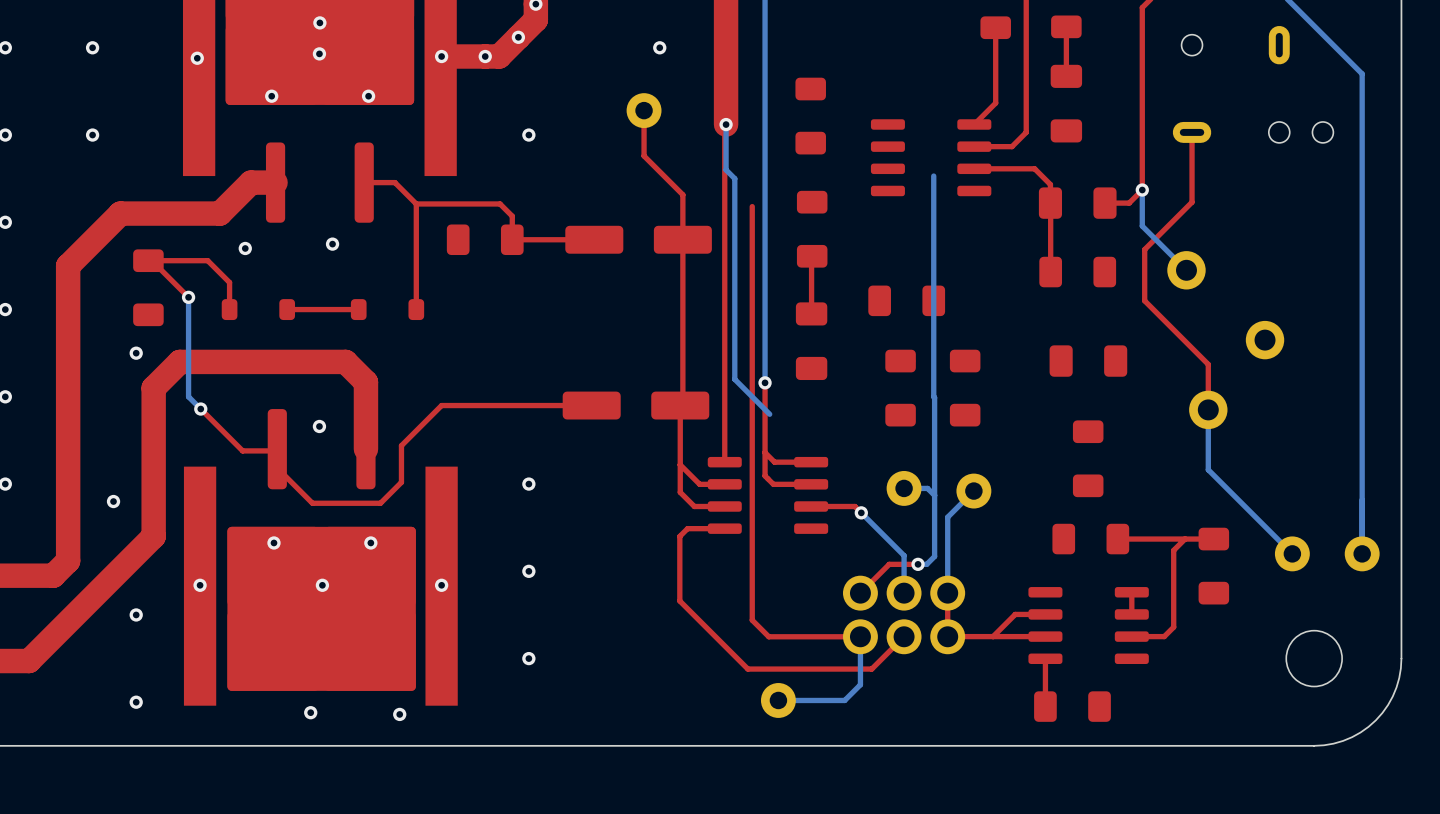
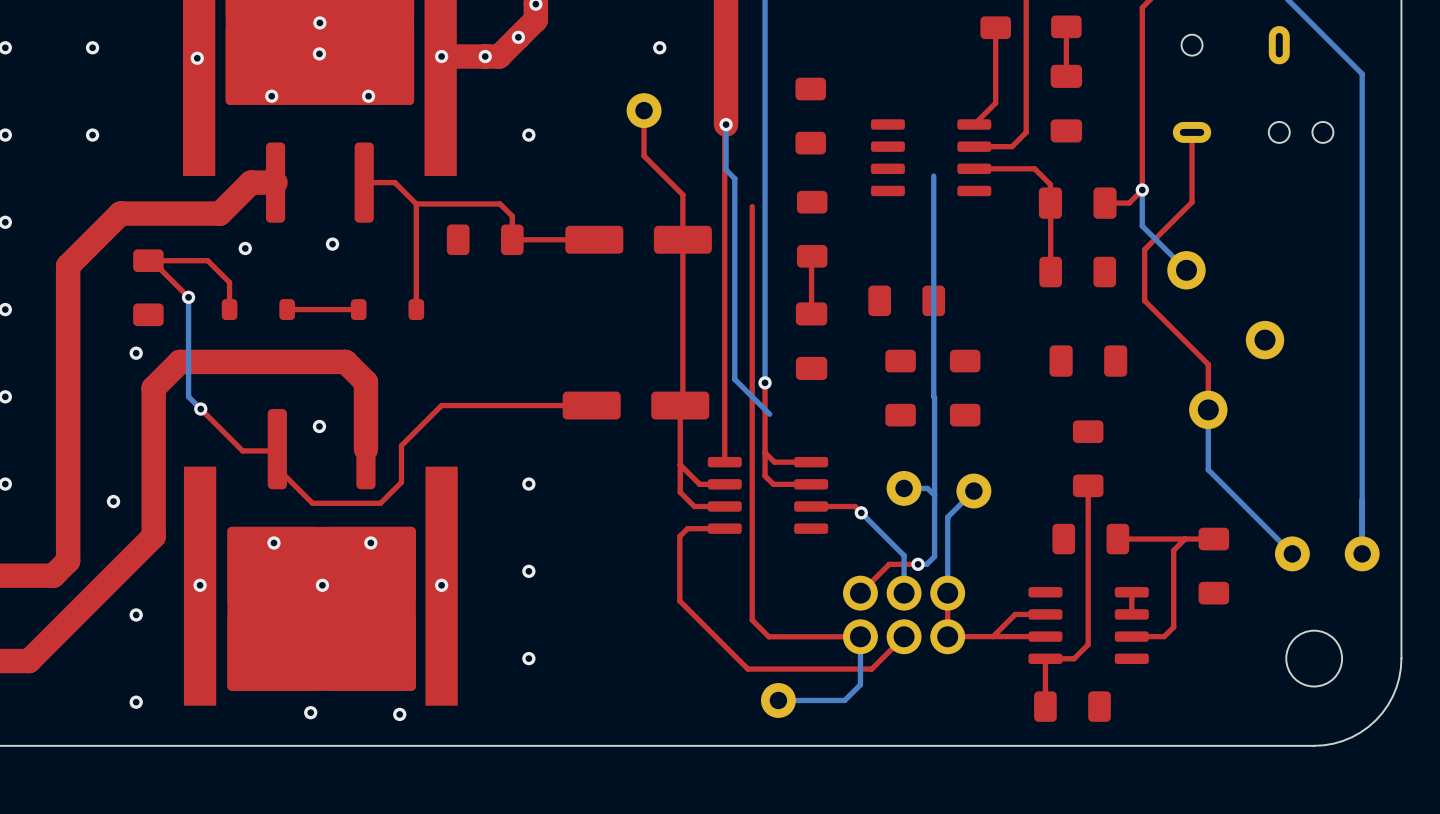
top track: none -> (1088, 485) (1088, 644) (1074, 658) (1045, 658)

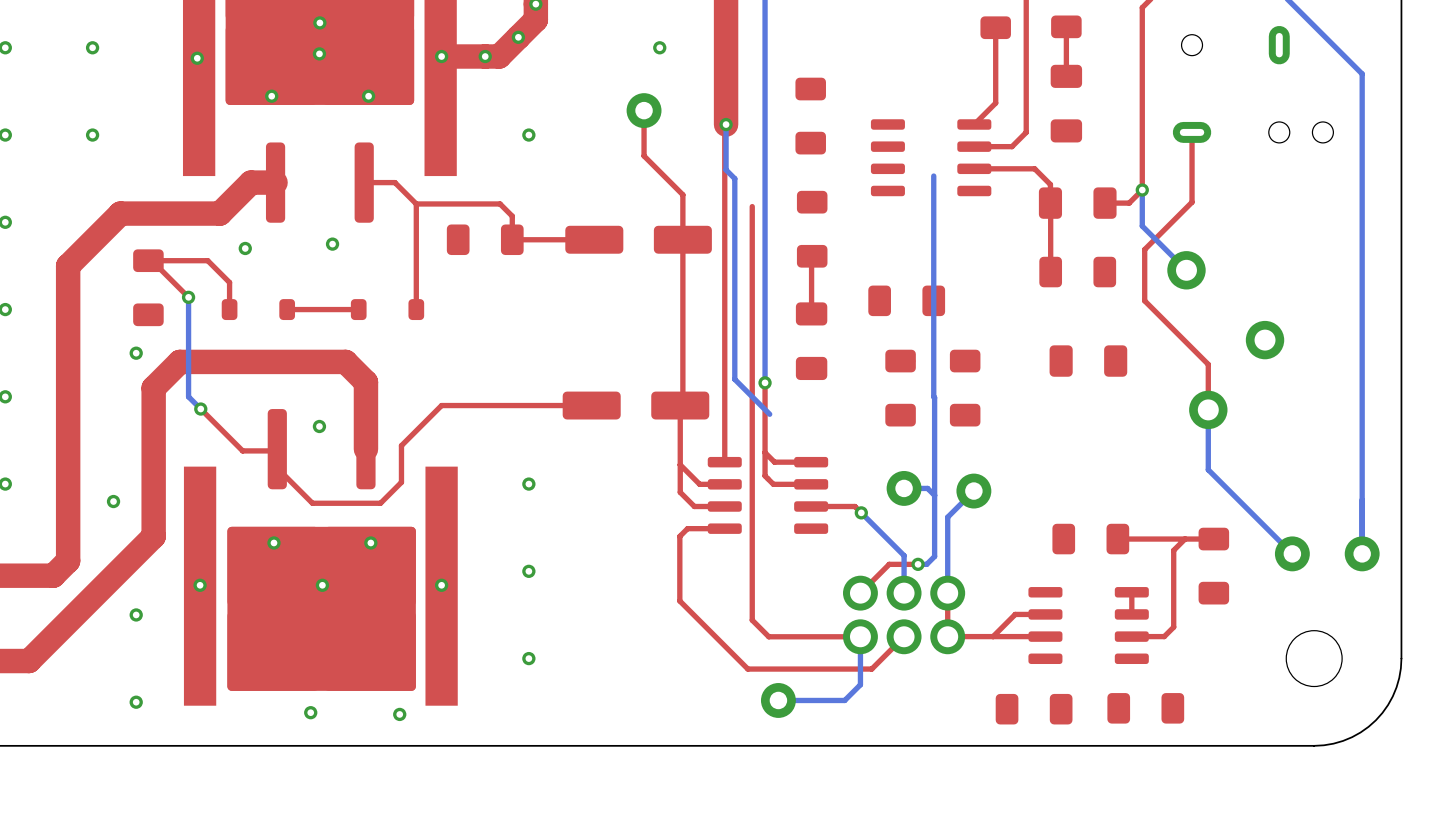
part: (1088, 458) -> none
top track: (1088, 485) (1088, 644) (1074, 658) (1045, 658) (1045, 706) -> none
part: (1072, 706) -> none
part: none -> (1145, 708)
part: none -> (1034, 709)

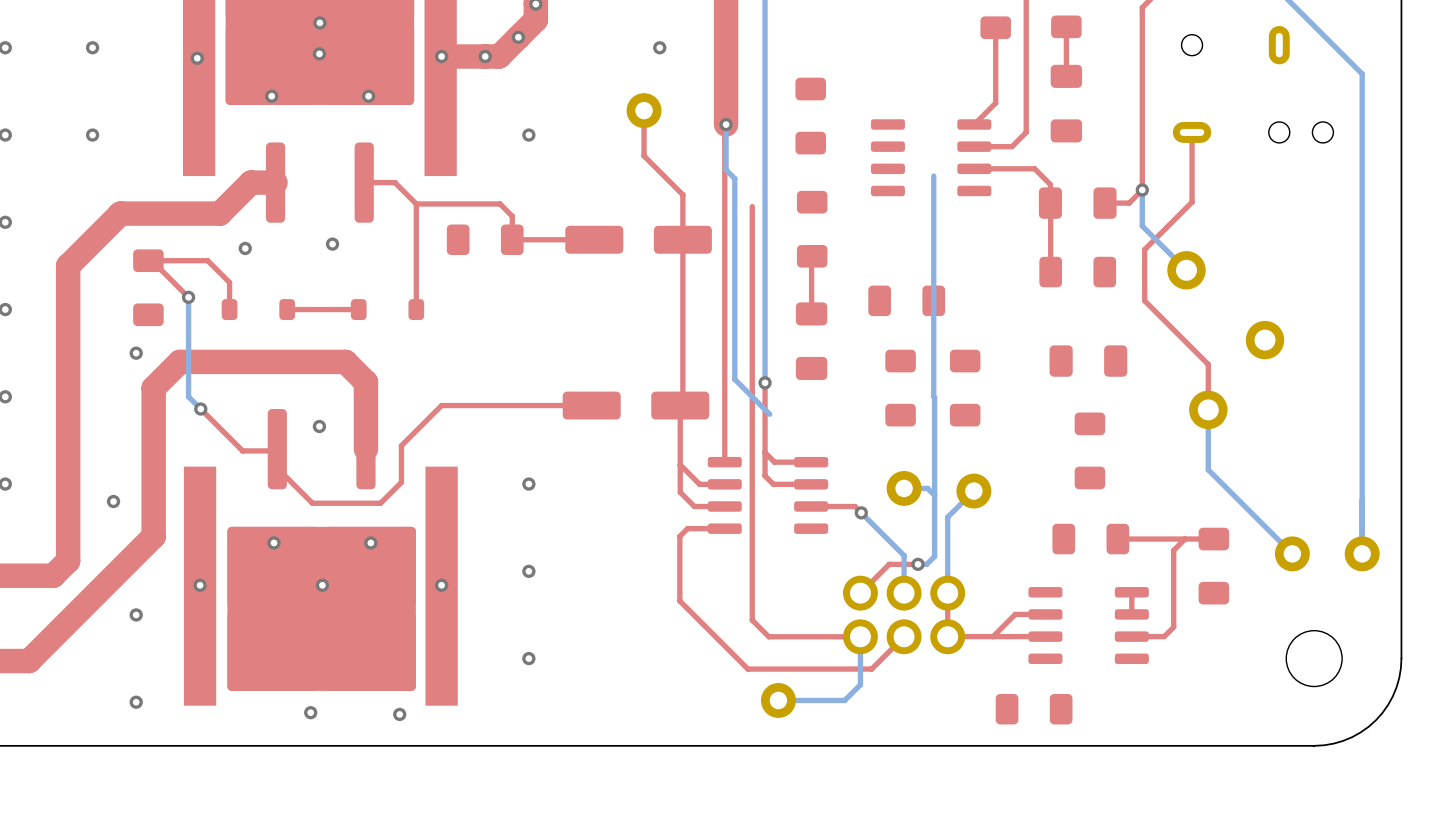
part rotation: 0° (1145, 708) -> 90° clockwise (1089, 450)
part position: (1145, 708) -> (1089, 450)

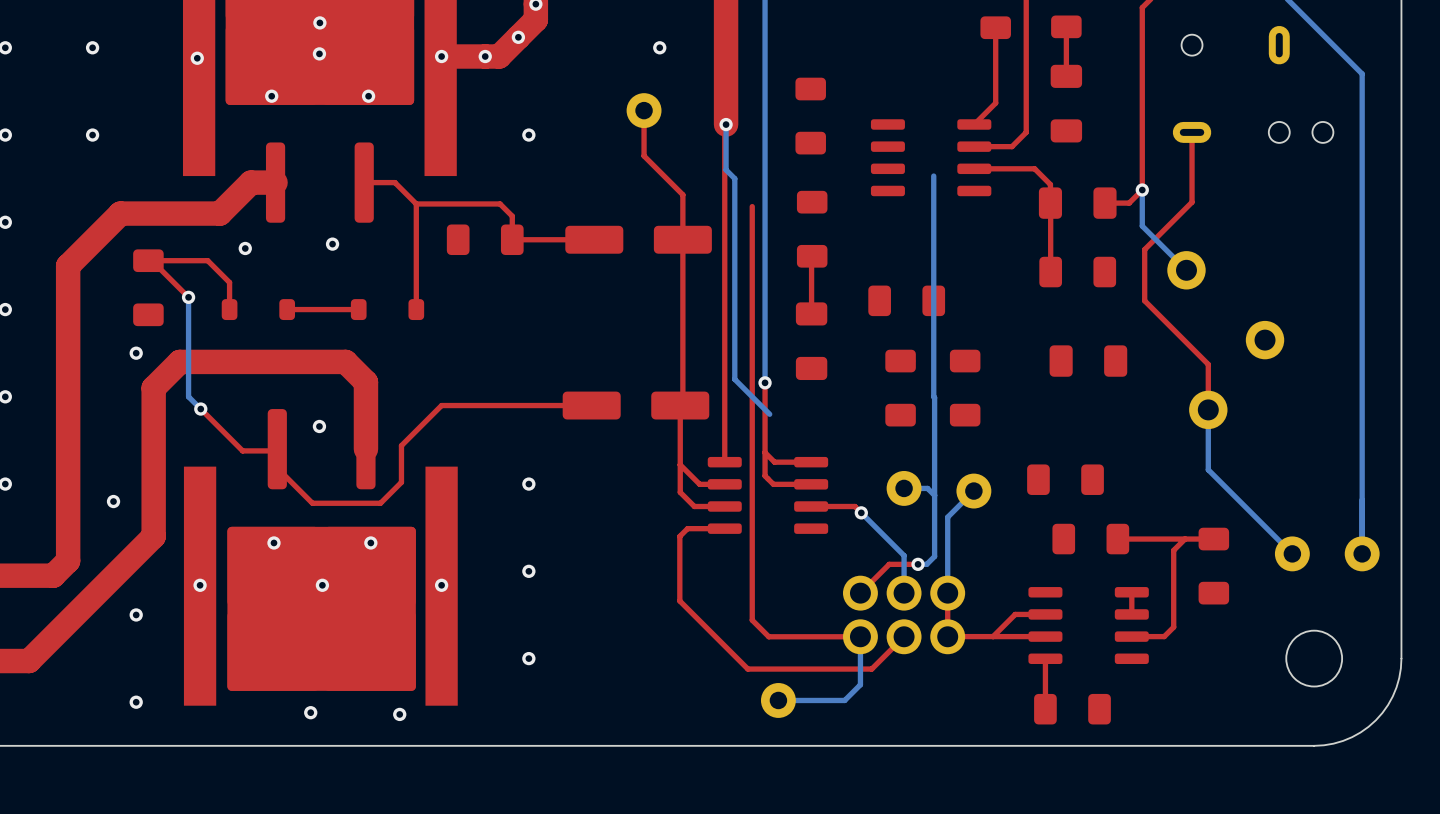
part rotation: 0° (1089, 450) -> 90° clockwise (1065, 479)
top track: none -> (1045, 658) (1045, 709)
part position: (1034, 709) -> (1072, 709)

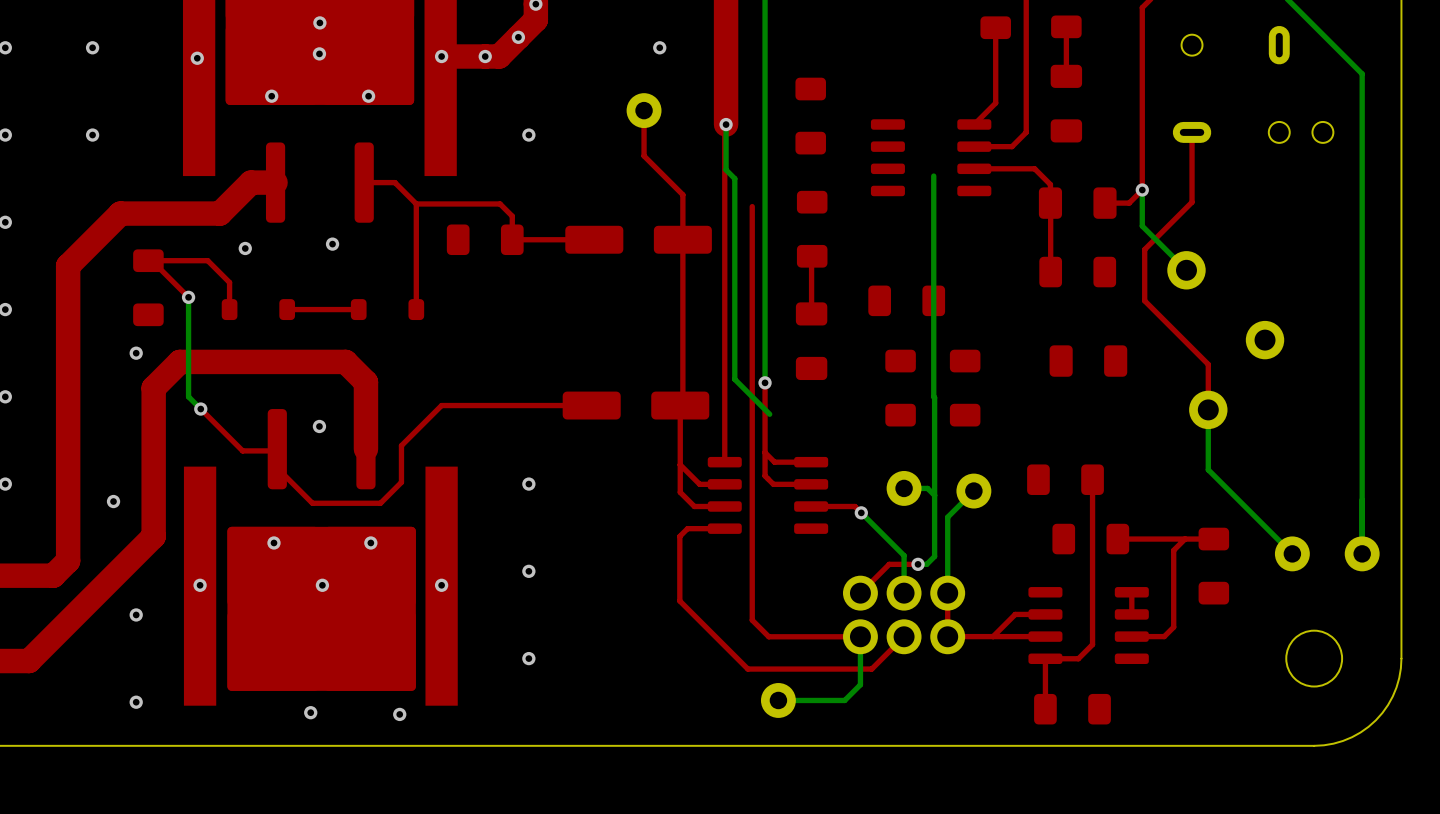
top track: none -> (1092, 479) (1092, 644) (1078, 658) (1045, 658)

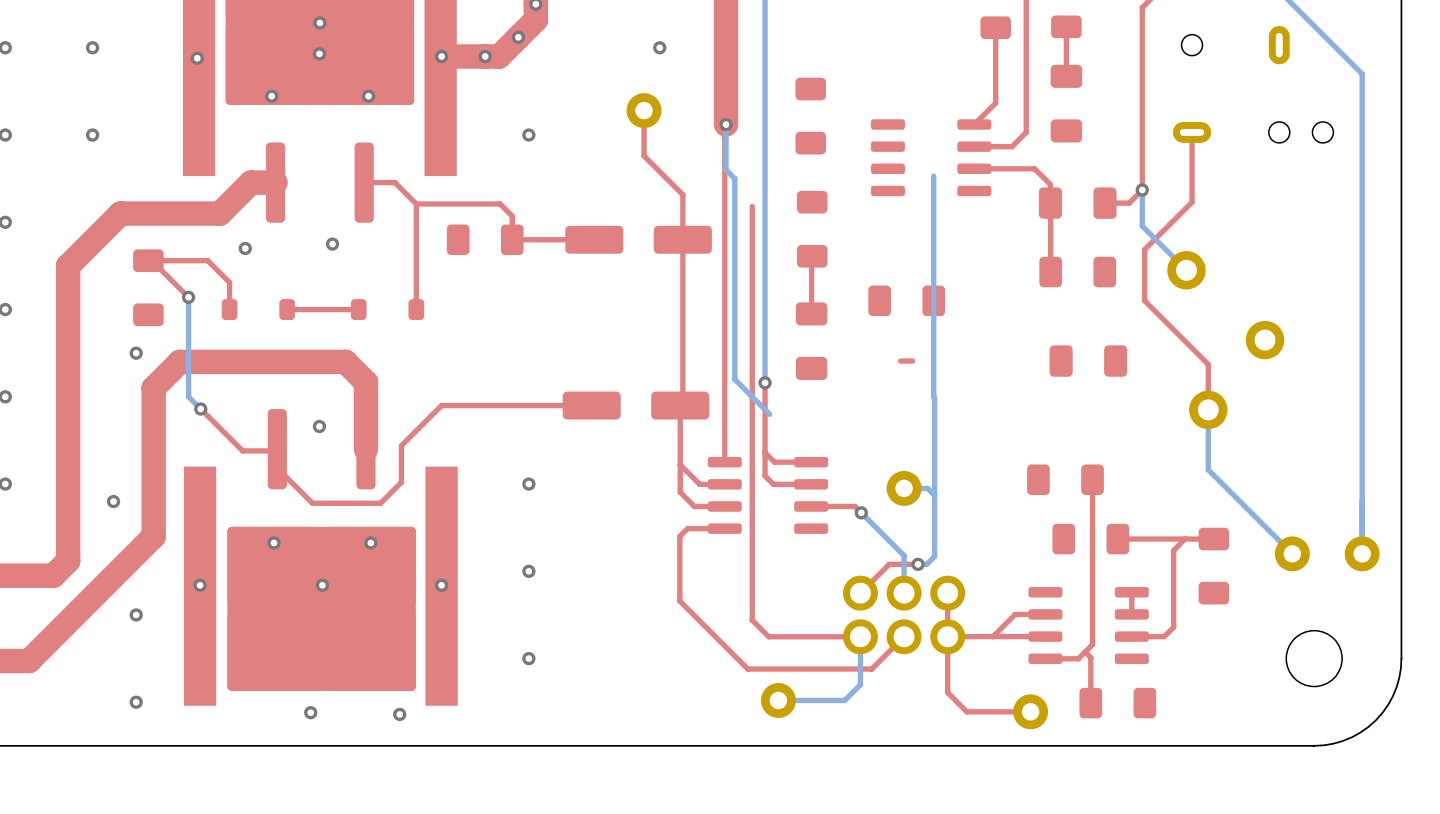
part: (900, 388) -> none
part: (965, 388) -> none
part position: (973, 491) -> (1030, 711)
bottom track: (972, 492) (947, 517) (947, 593) -> none
top track: none -> (947, 636) (947, 692) (966, 711) (1030, 711)
top track: none -> (1085, 652) (1090, 657) (1090, 703)
top track: (1045, 658) (1045, 709) -> none
part position: (1072, 709) -> (1117, 703)

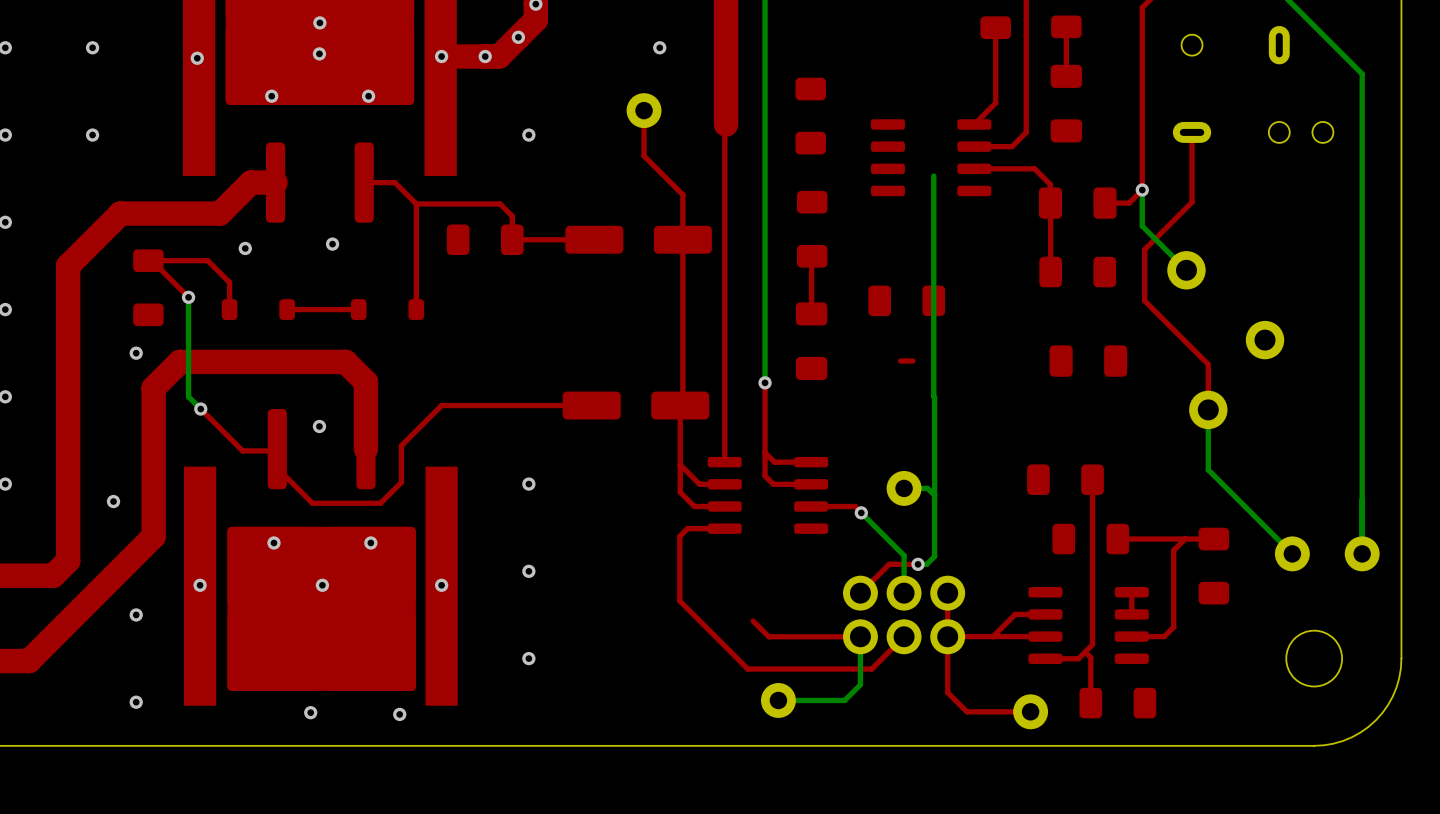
bottom track: (726, 124) (726, 169) (734, 178) (734, 379) (769, 414) -> none
via: (726, 124) -> none
top track: (752, 206) (753, 621) -> none

